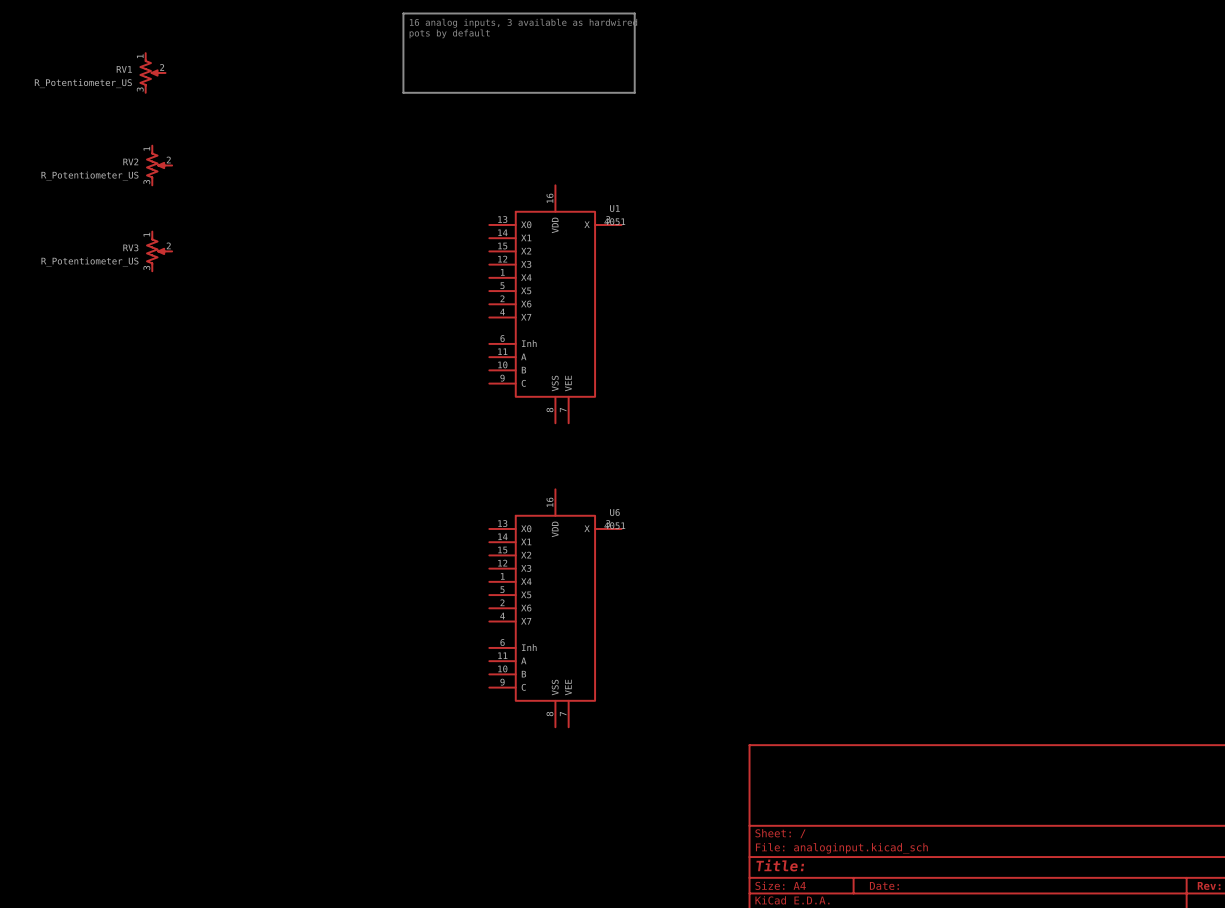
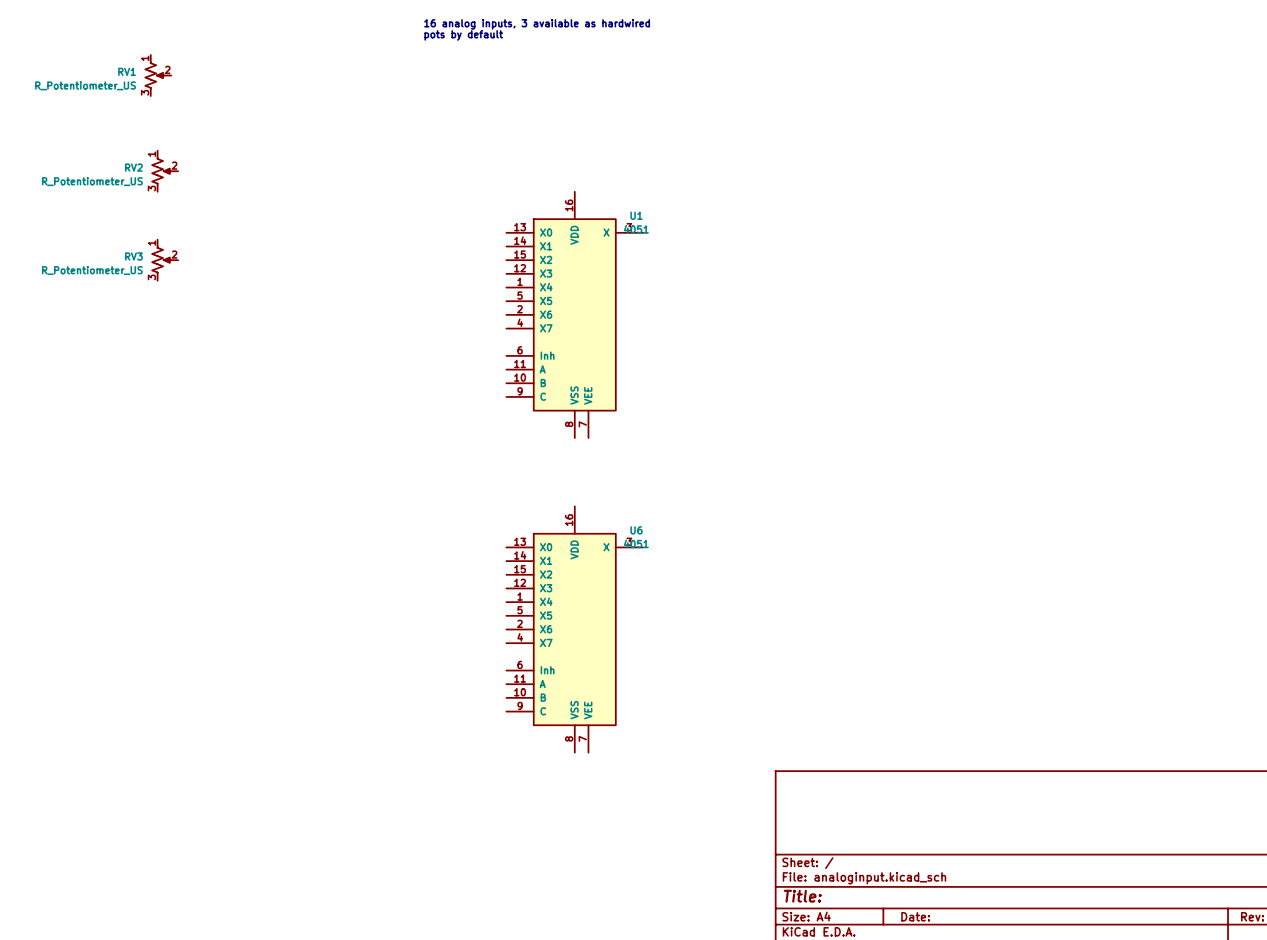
line: (403, 13) (634, 13) (634, 92) (403, 92) (403, 13) -> none

